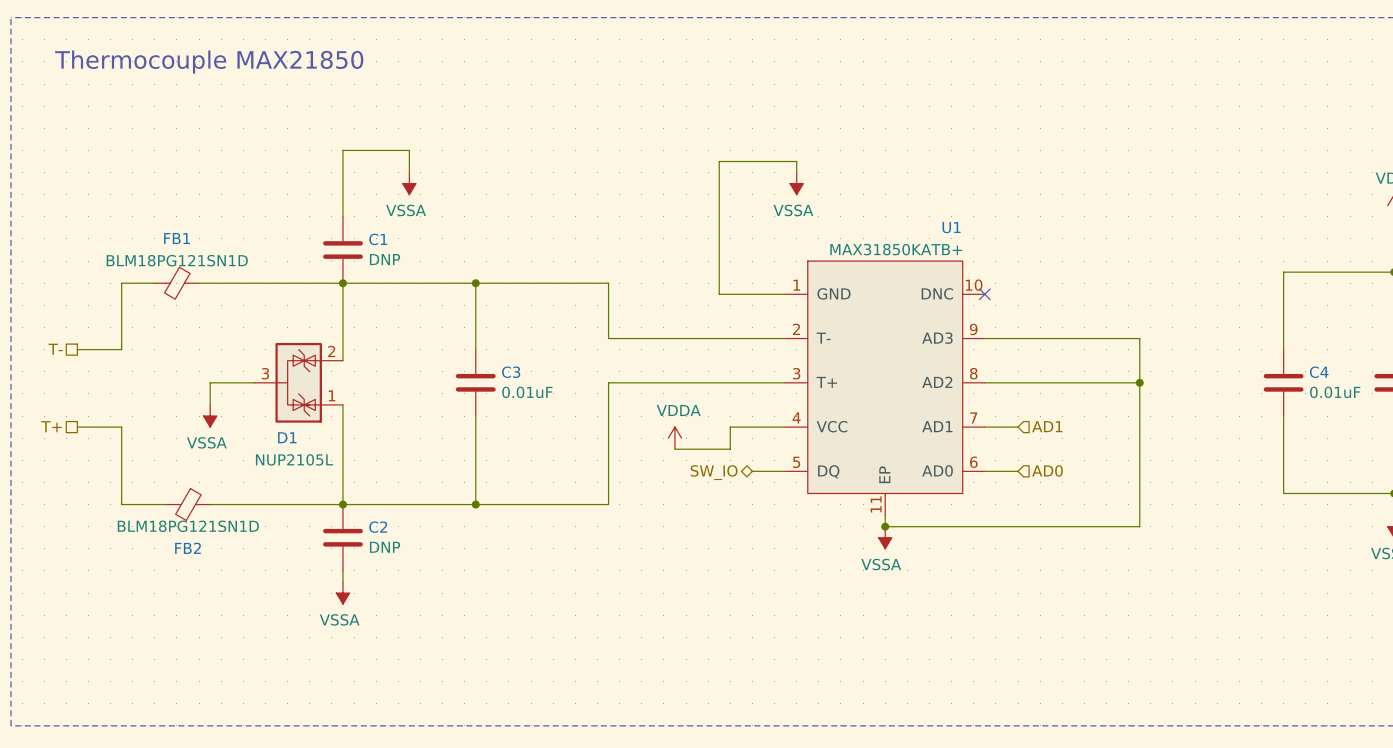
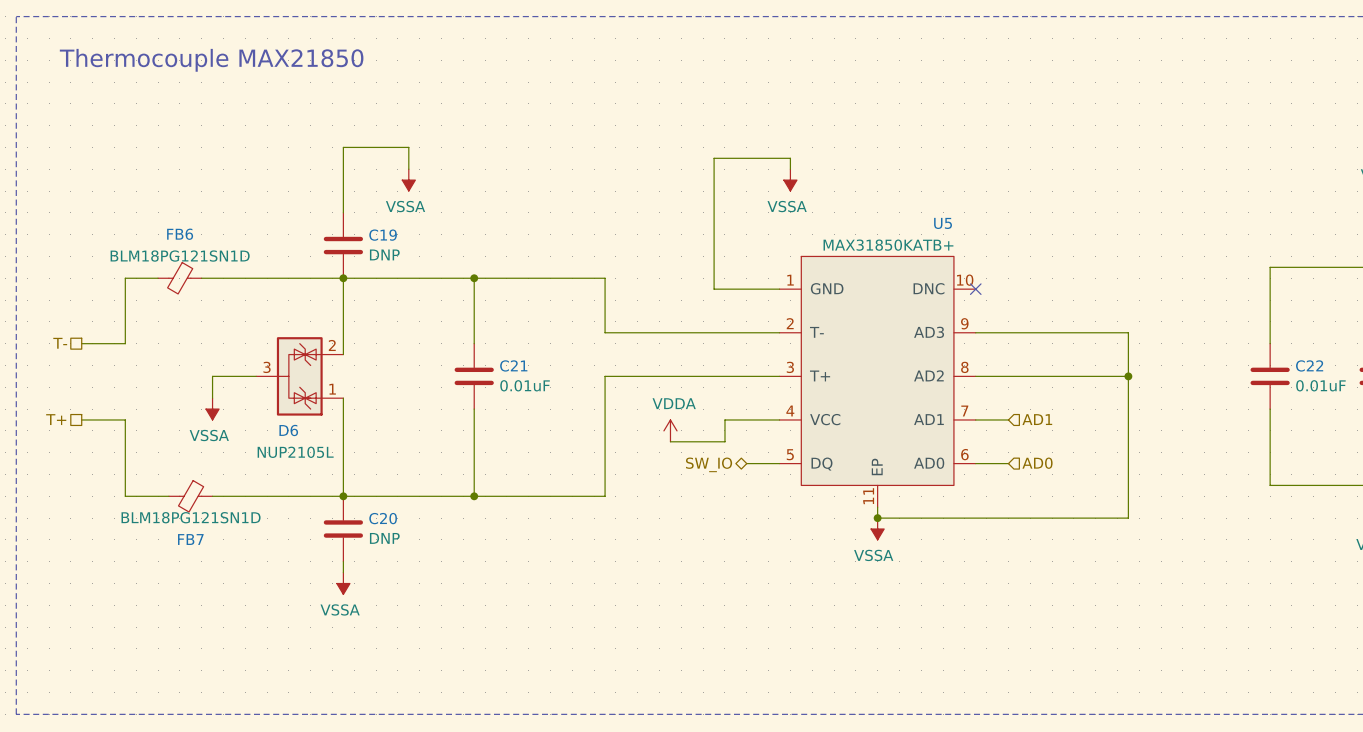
U1 name: U1 (951, 227) -> U5 (943, 223)
FB1 name: FB1 (177, 238) -> FB6 (180, 234)
C1 name: C1 (378, 239) -> C19 (383, 235)
C3 name: C3 (511, 372) -> C21 (513, 365)
C4 name: C4 (1319, 372) -> C22 (1309, 365)
D1 name: D1 (287, 437) -> D6 (288, 430)
C2 name: C2 (378, 527) -> C20 (383, 518)
FB2 name: FB2 (188, 548) -> FB7 (190, 539)

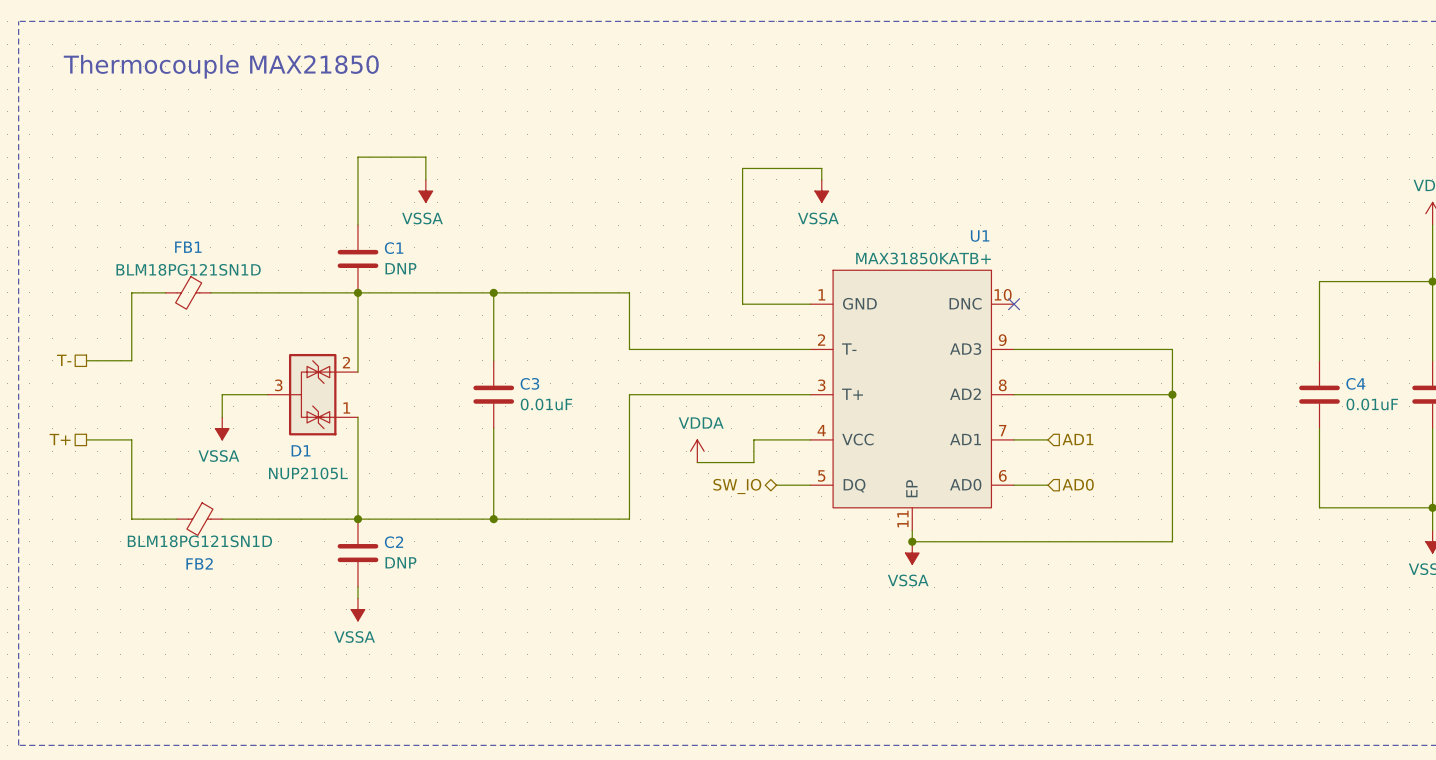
U5 name: U5 (943, 223) -> U1 (980, 236)
FB6 name: FB6 (180, 234) -> FB1 (188, 247)
C19 name: C19 (383, 235) -> C1 (394, 248)
C21 name: C21 (513, 365) -> C3 (529, 383)
C22 name: C22 (1309, 365) -> C4 (1355, 383)
D6 name: D6 (288, 430) -> D1 (301, 450)
C20 name: C20 (383, 518) -> C2 (394, 542)
FB7 name: FB7 (190, 539) -> FB2 (199, 563)

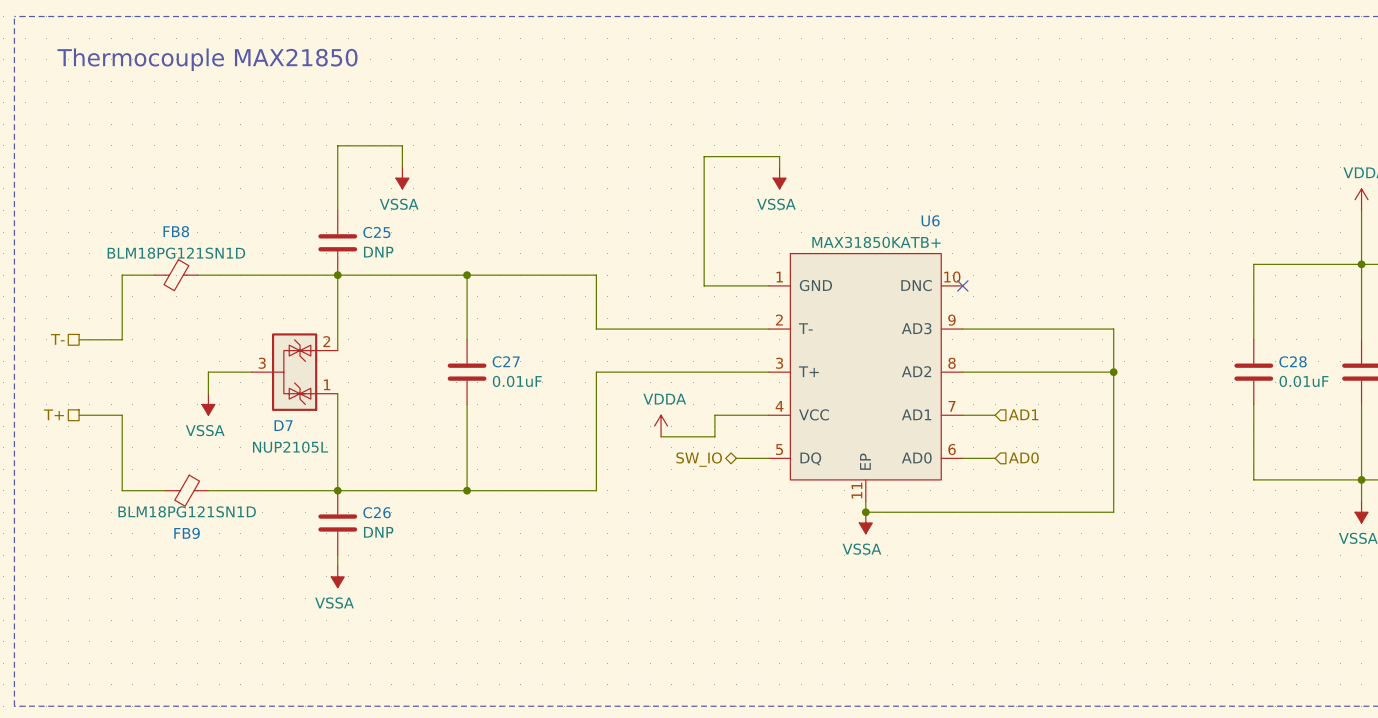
U1 name: U1 (980, 236) -> U6 (930, 220)
FB1 name: FB1 (188, 247) -> FB8 (176, 231)
C1 name: C1 (394, 248) -> C25 (376, 232)
C3 name: C3 (529, 383) -> C27 (506, 361)
C4 name: C4 (1355, 383) -> C28 (1293, 361)
D1 name: D1 (301, 450) -> D7 (283, 425)
C2 name: C2 (394, 542) -> C26 (377, 512)
FB2 name: FB2 (199, 563) -> FB9 (187, 533)

